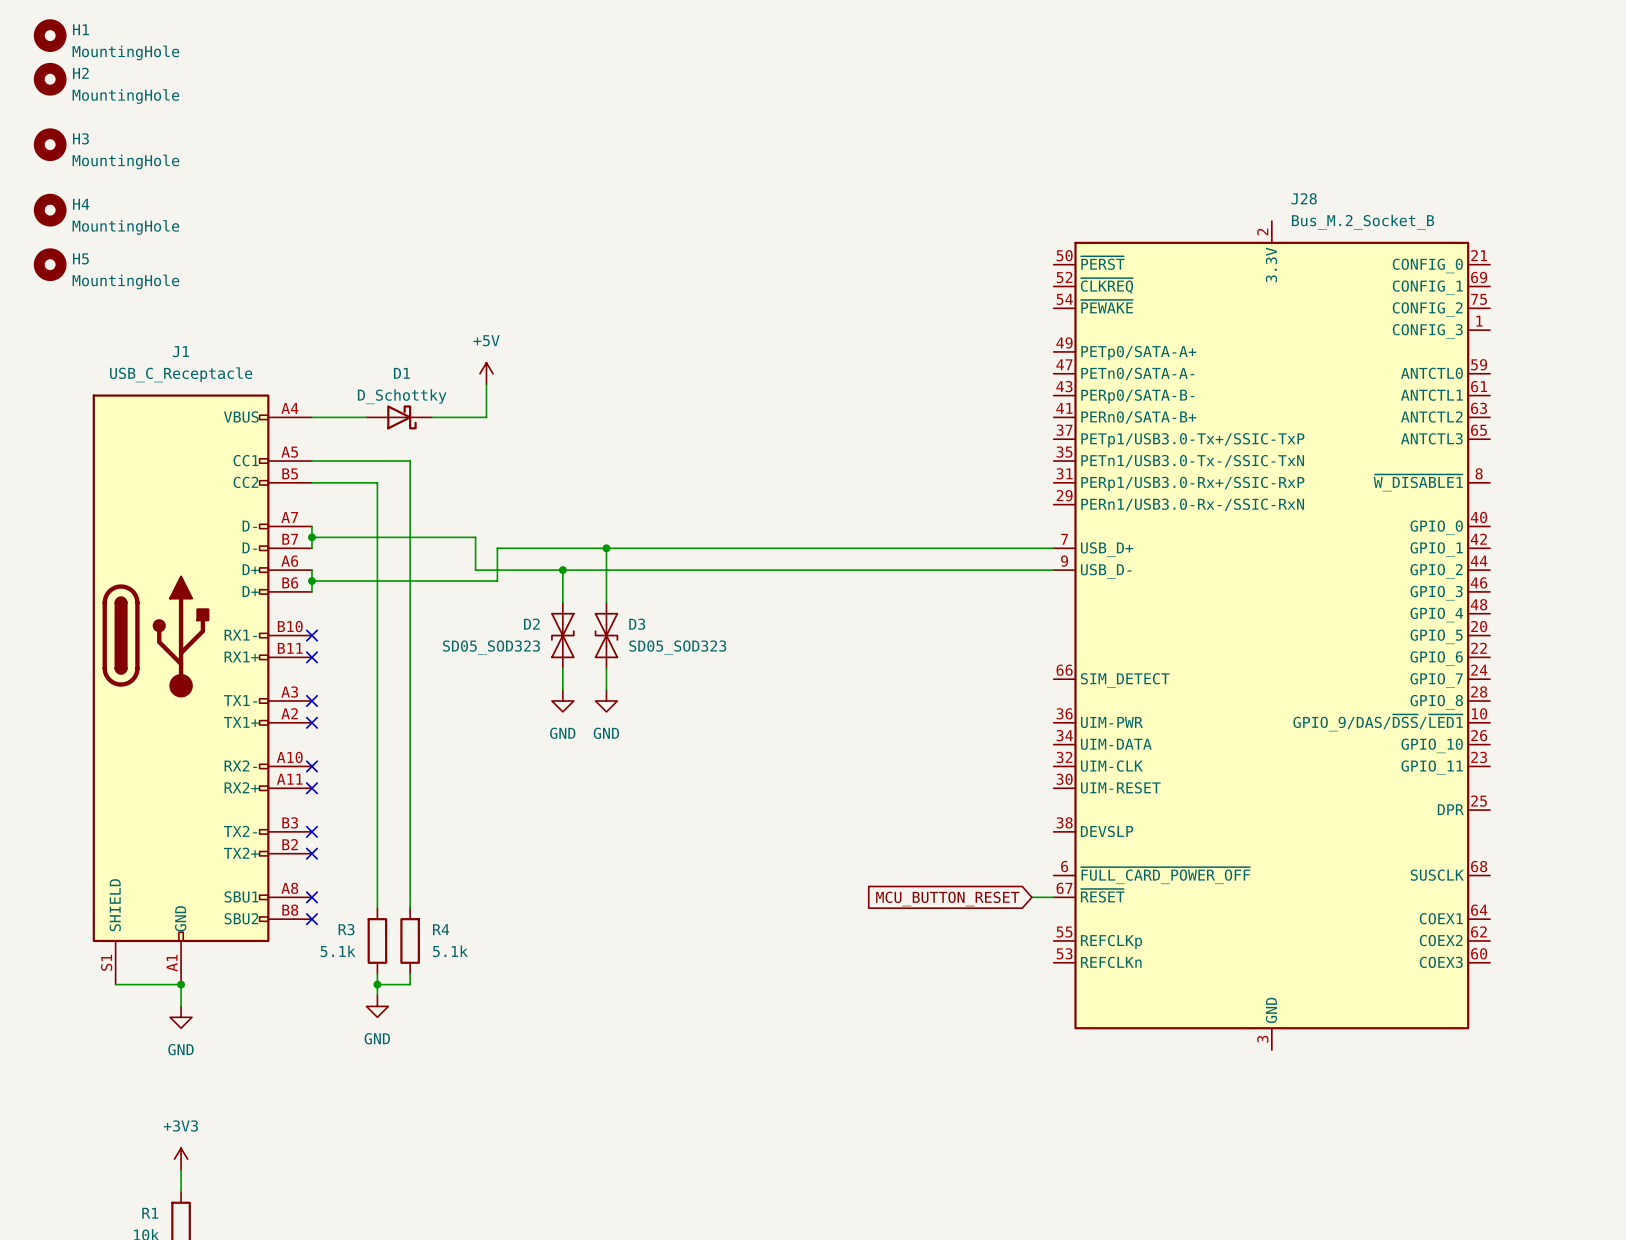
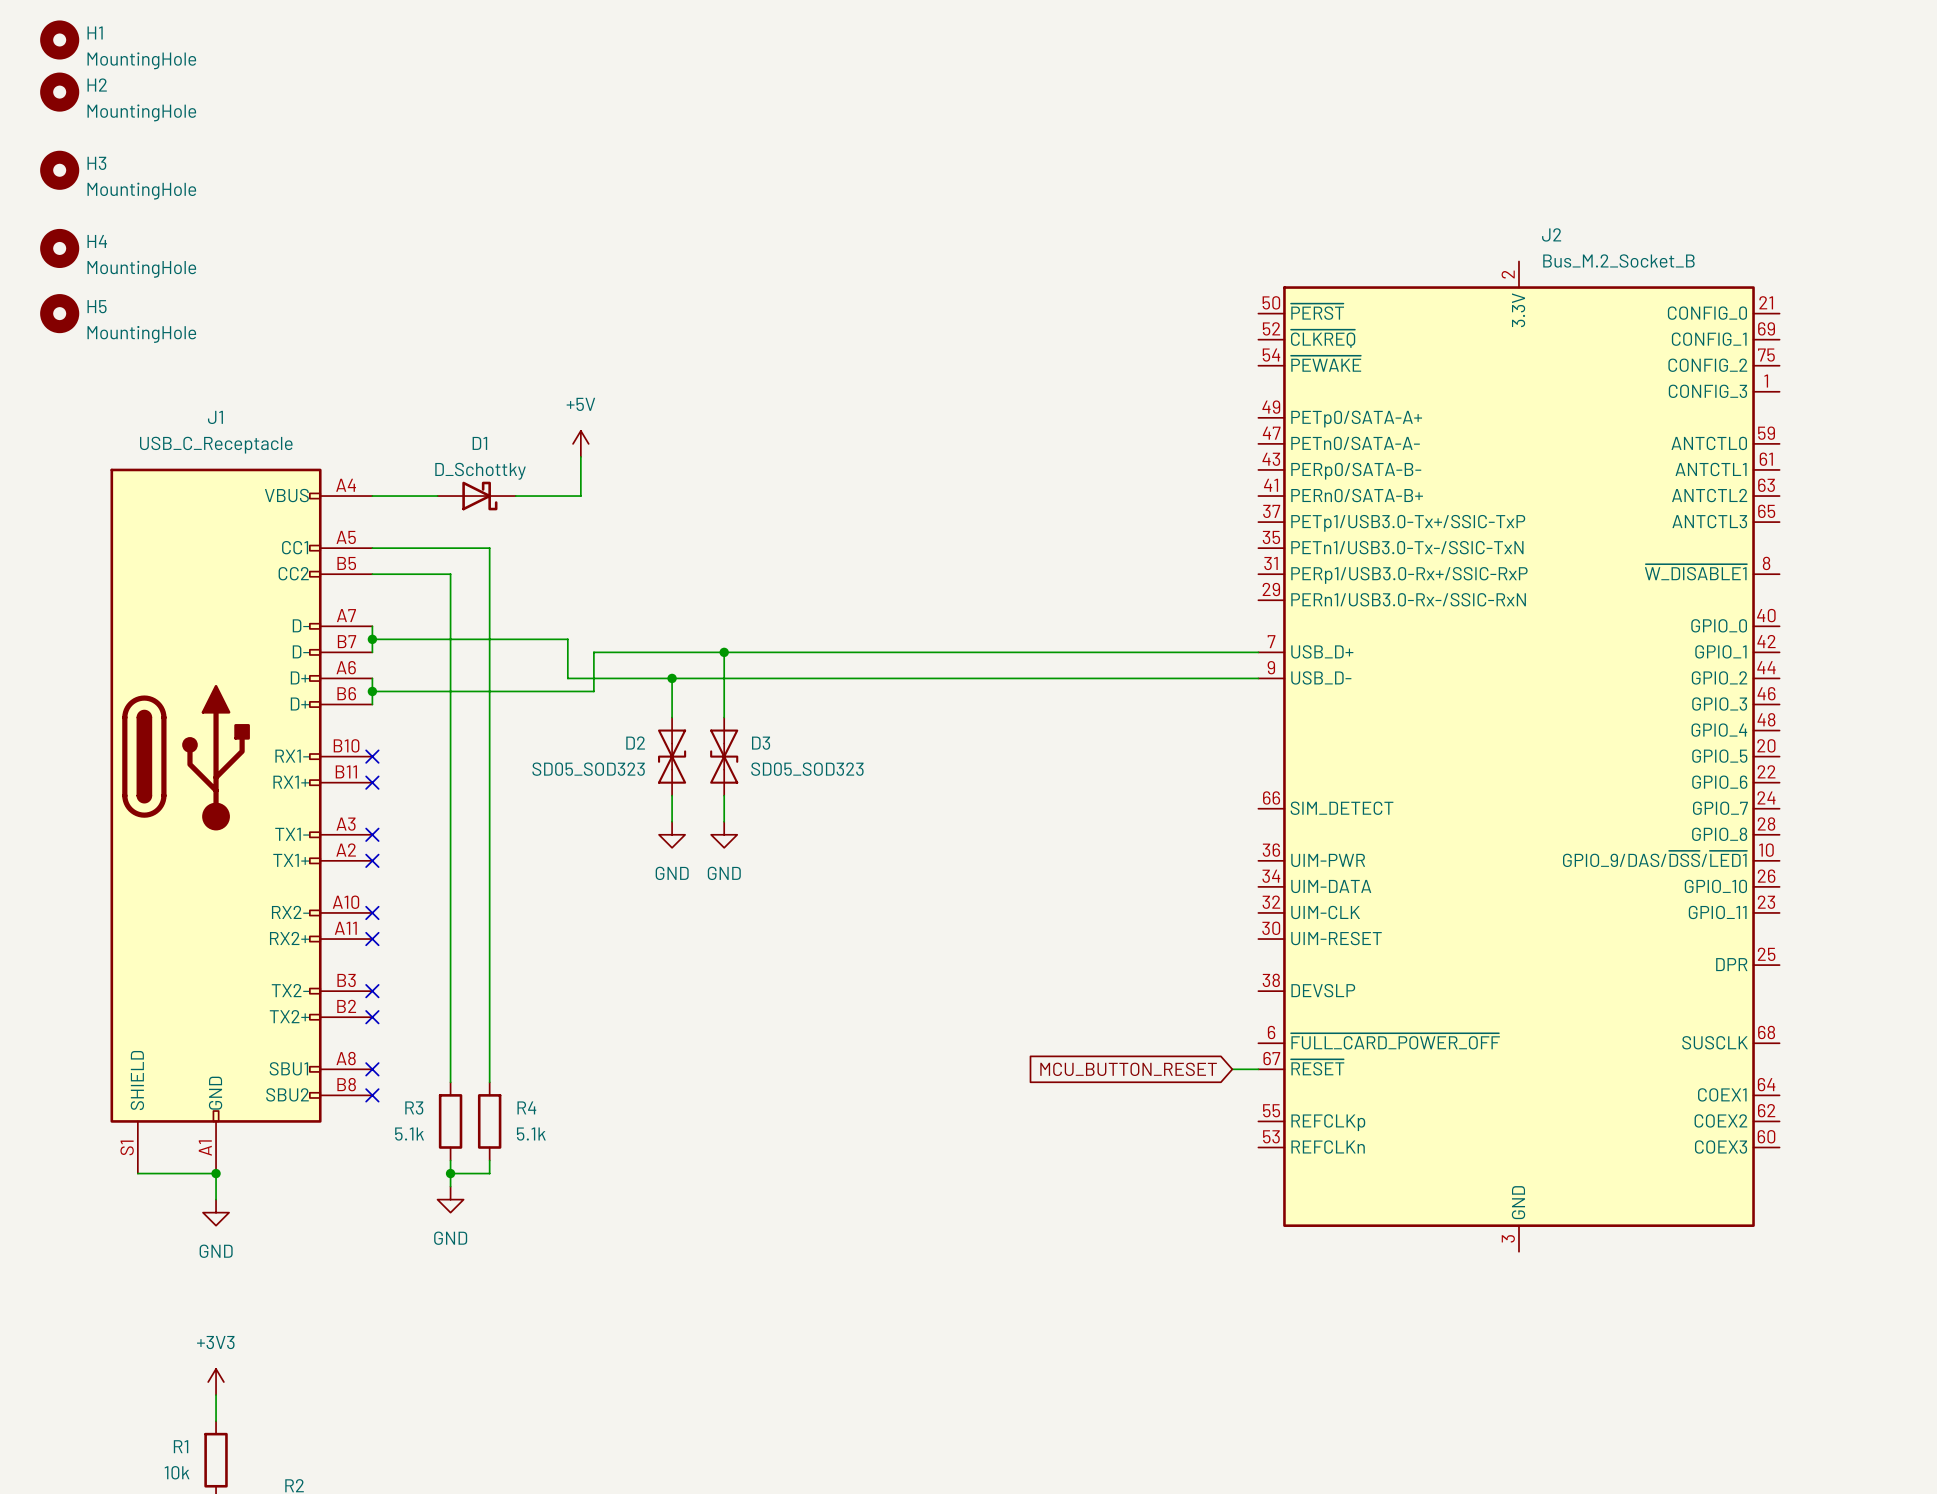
J28 name: J28 (1304, 198) -> J2 (1551, 234)

